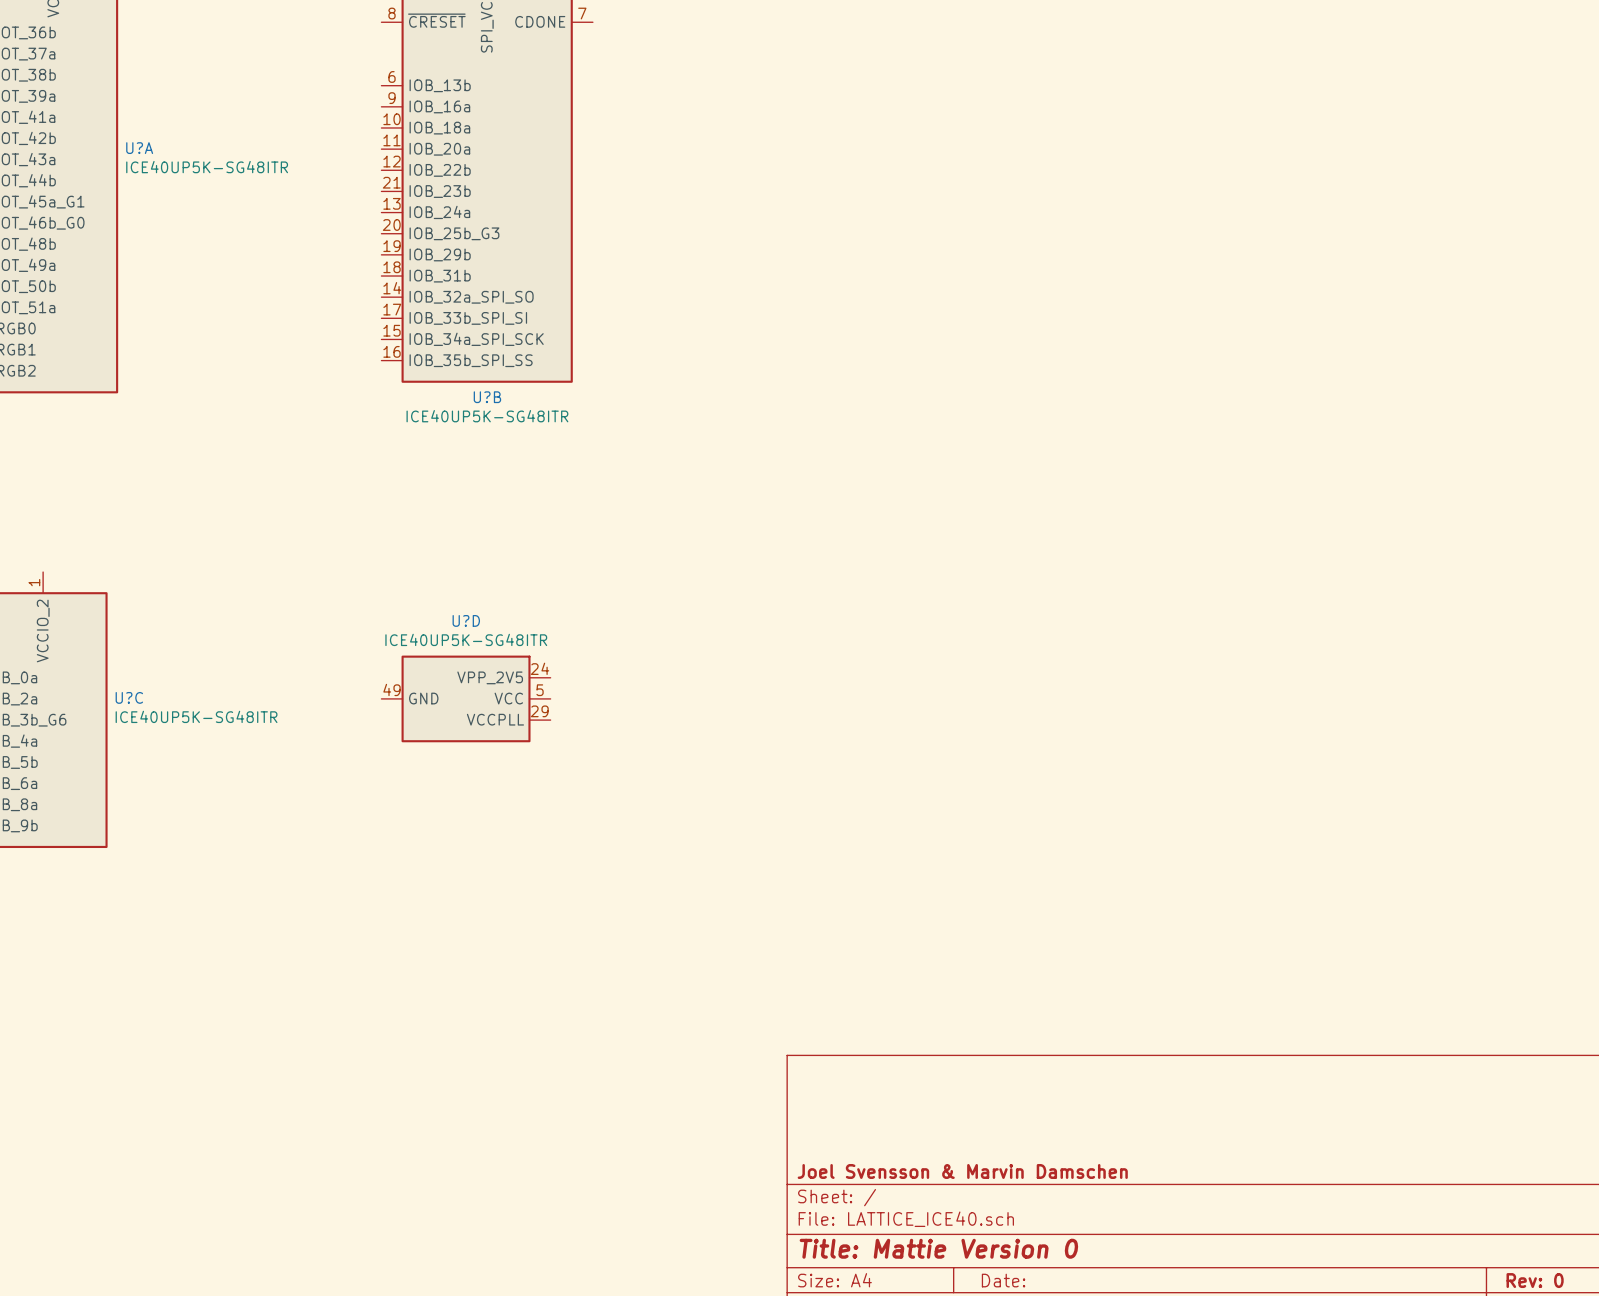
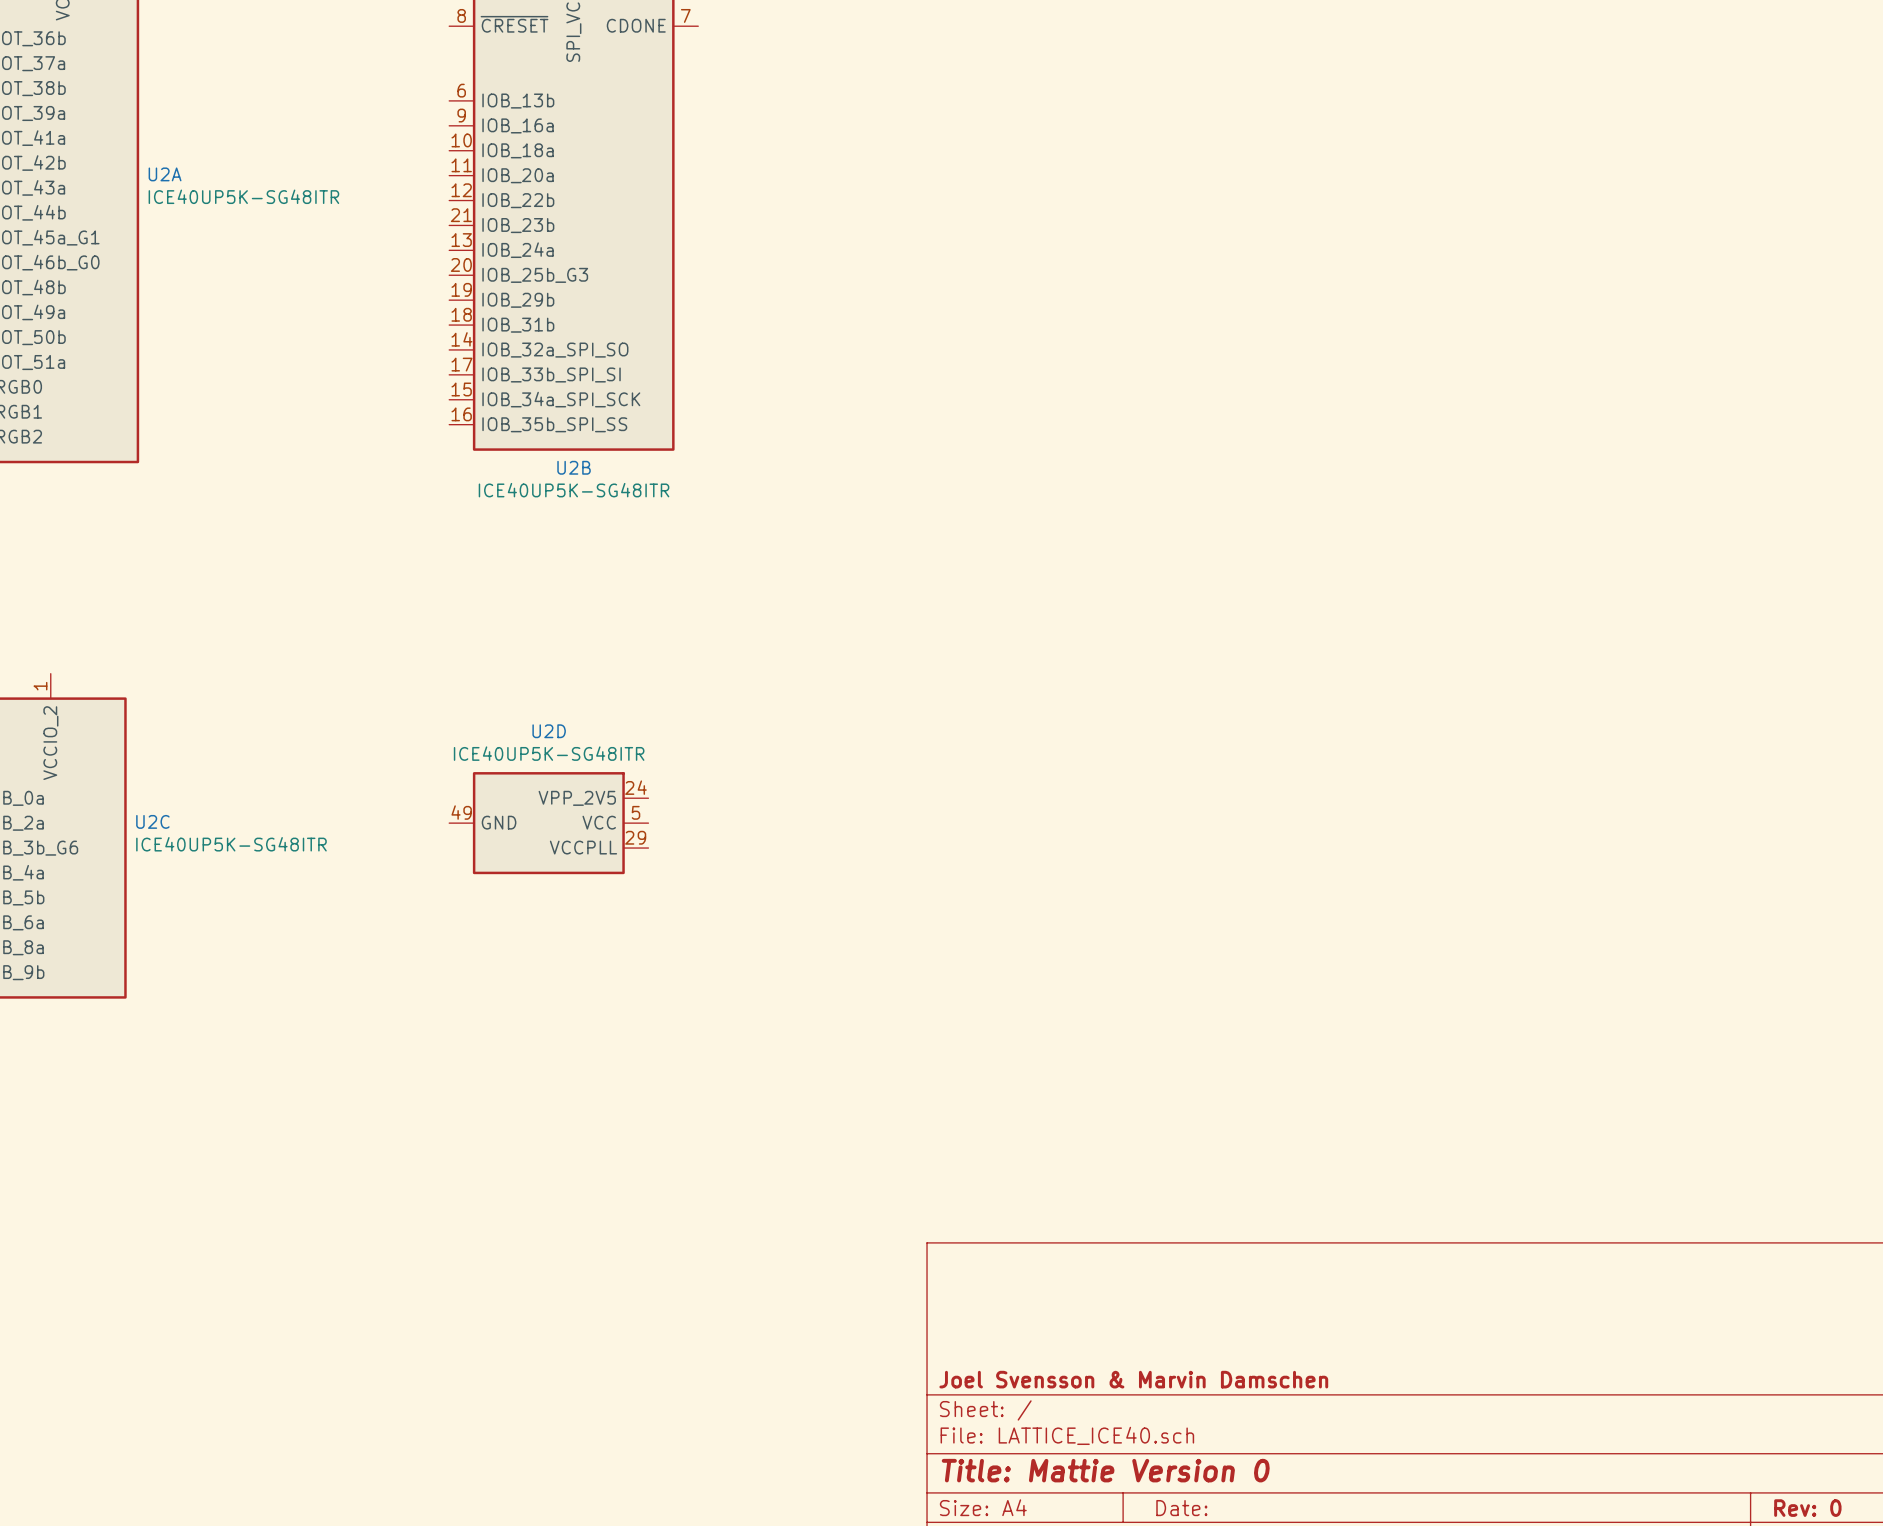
U?A name: U?A (139, 148) -> U2A (165, 174)
U?B name: U?B (487, 397) -> U2B (574, 467)
U?D name: U?D (466, 620) -> U2D (549, 731)
U?C name: U?C (129, 697) -> U2C (152, 821)

